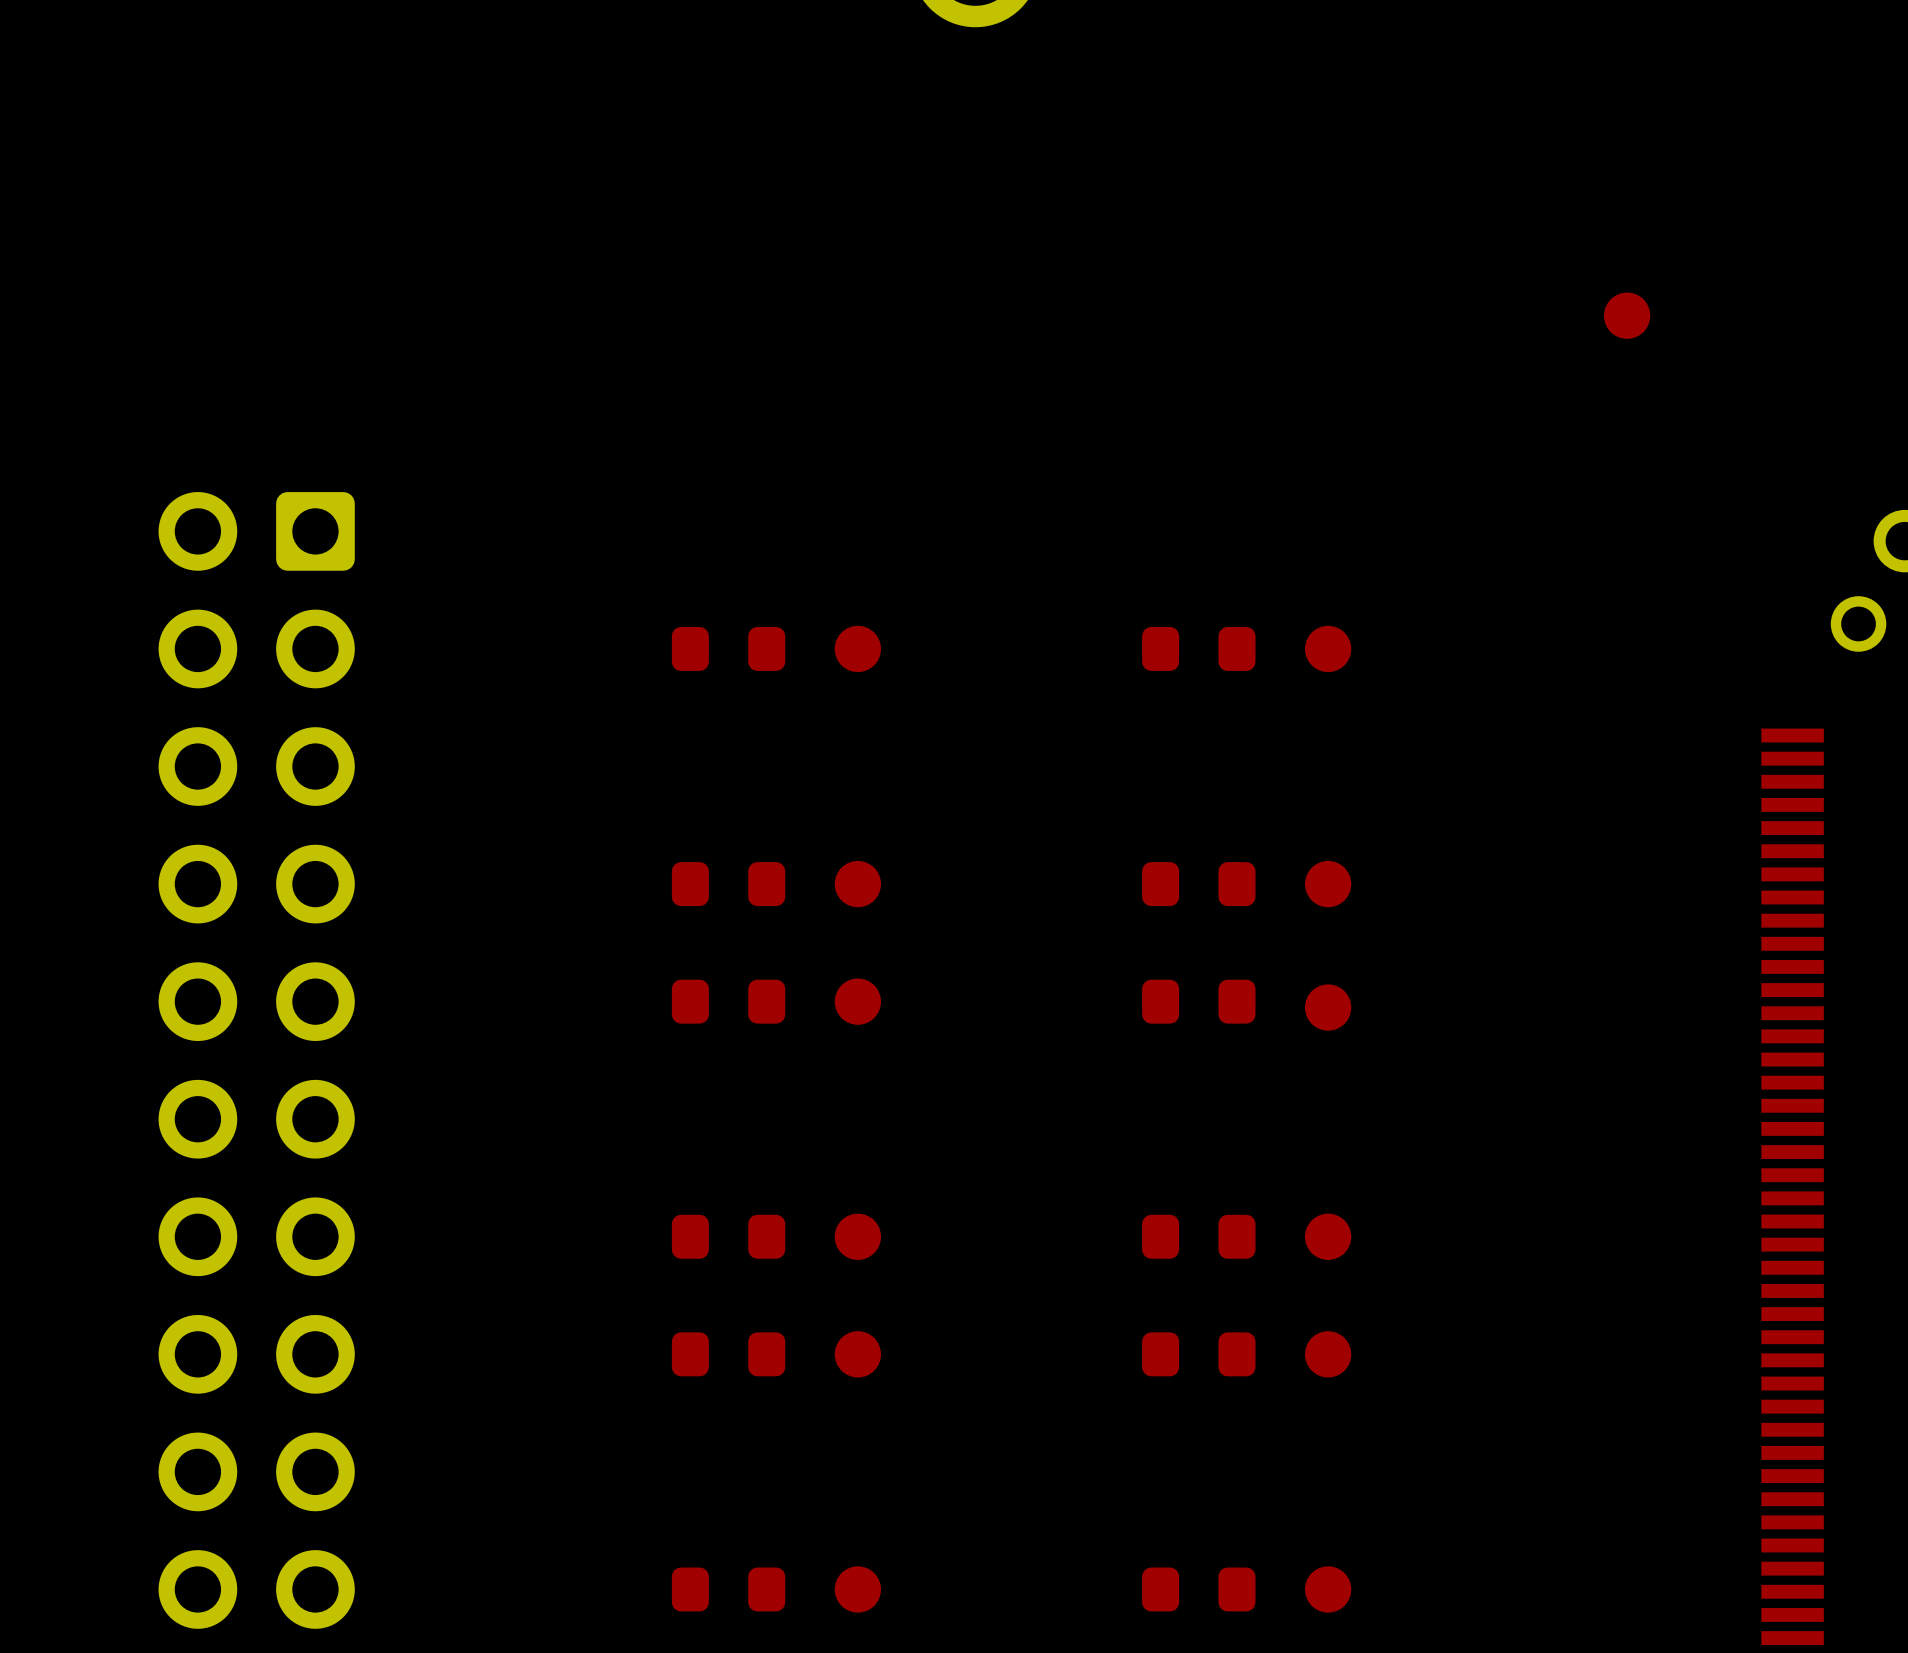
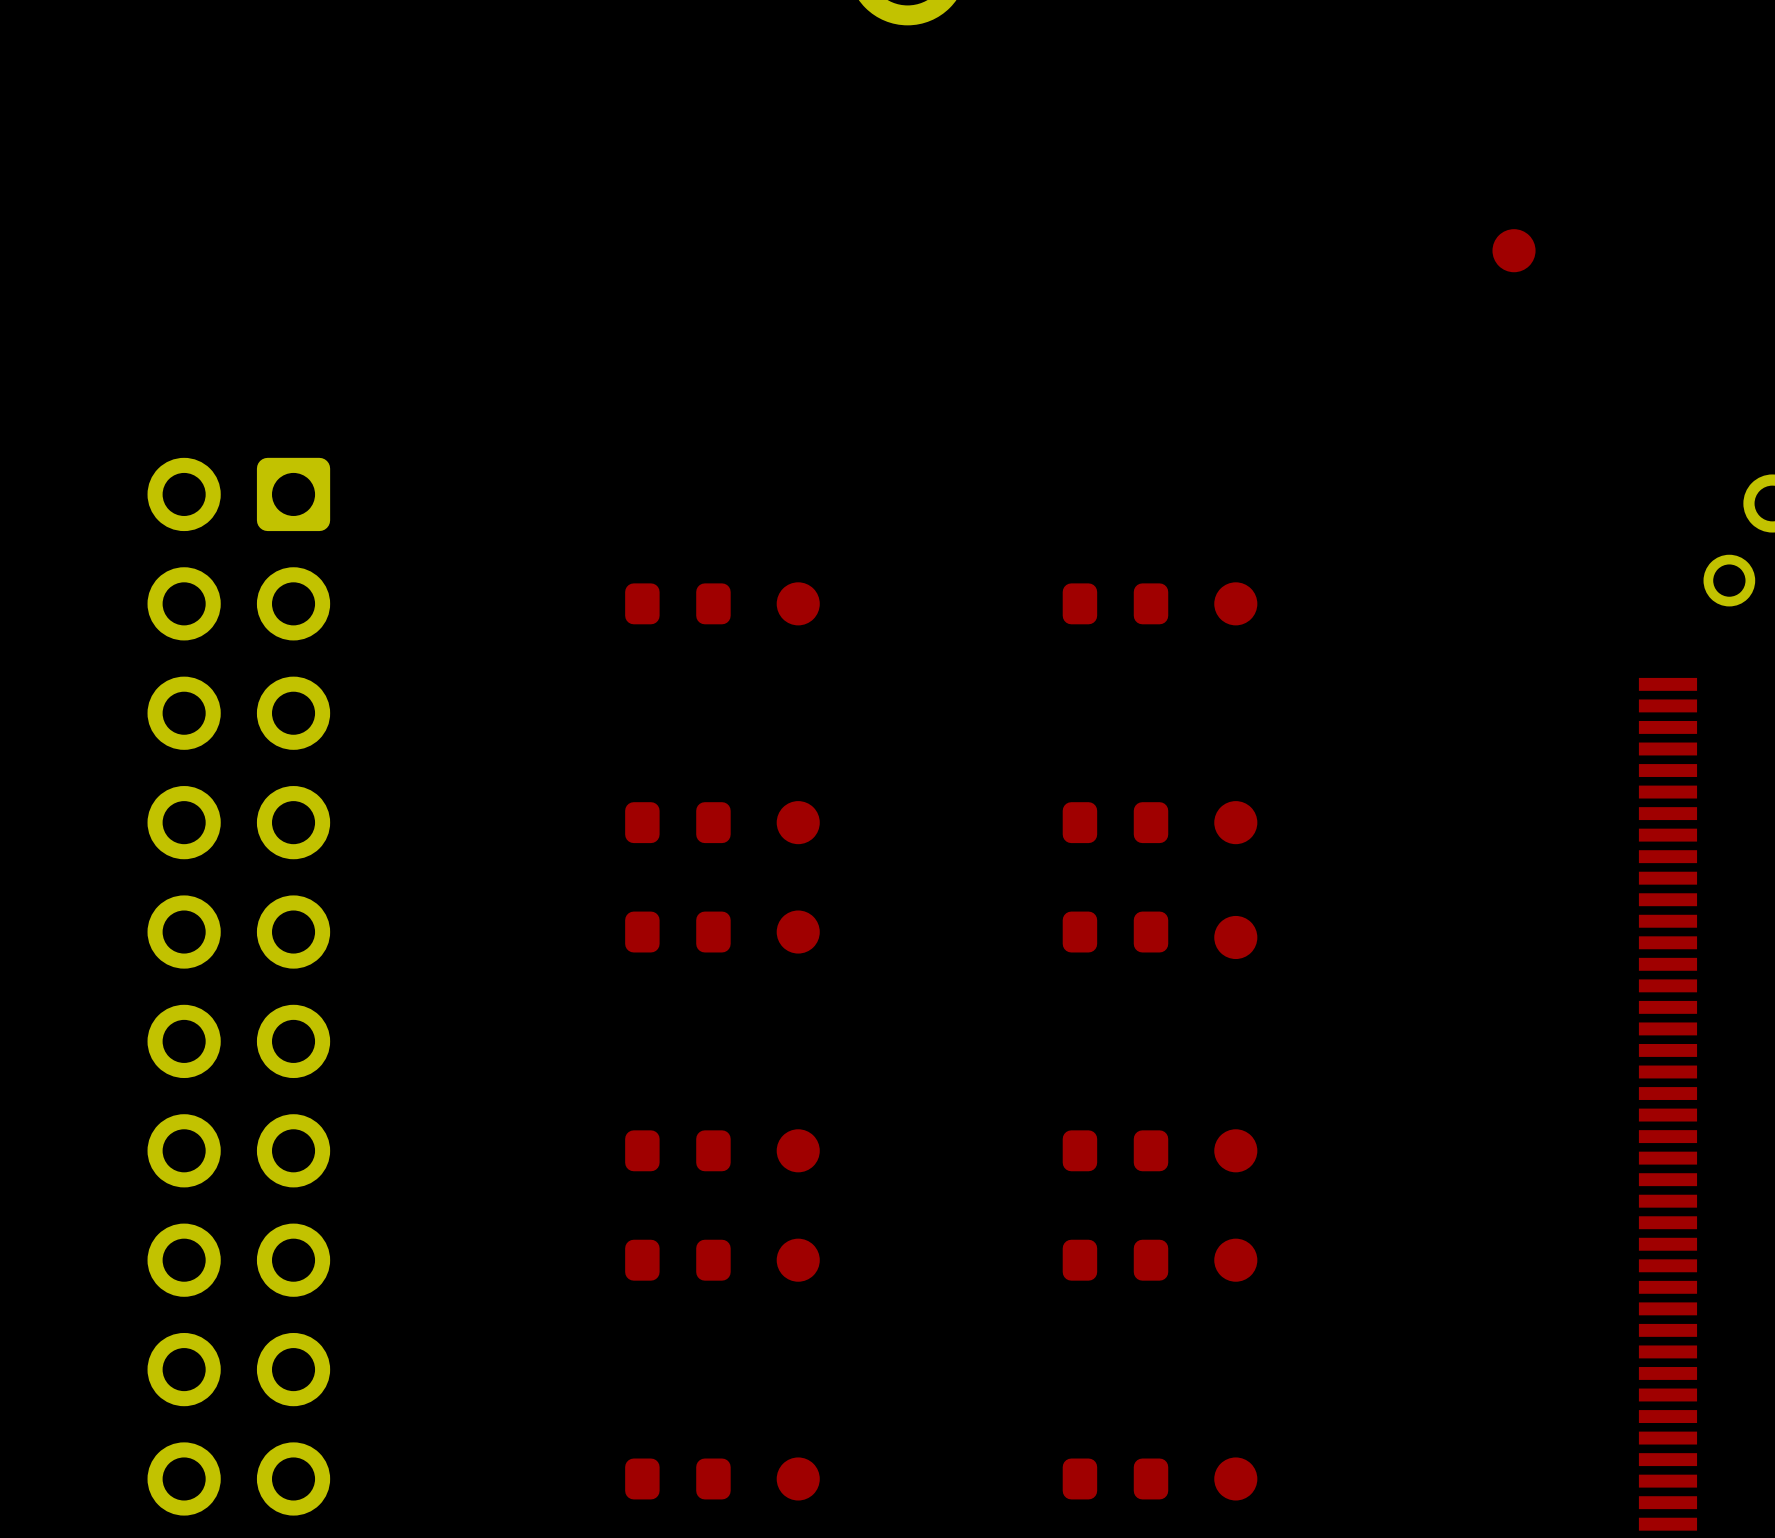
part position: (1627, 315) -> (1514, 250)

